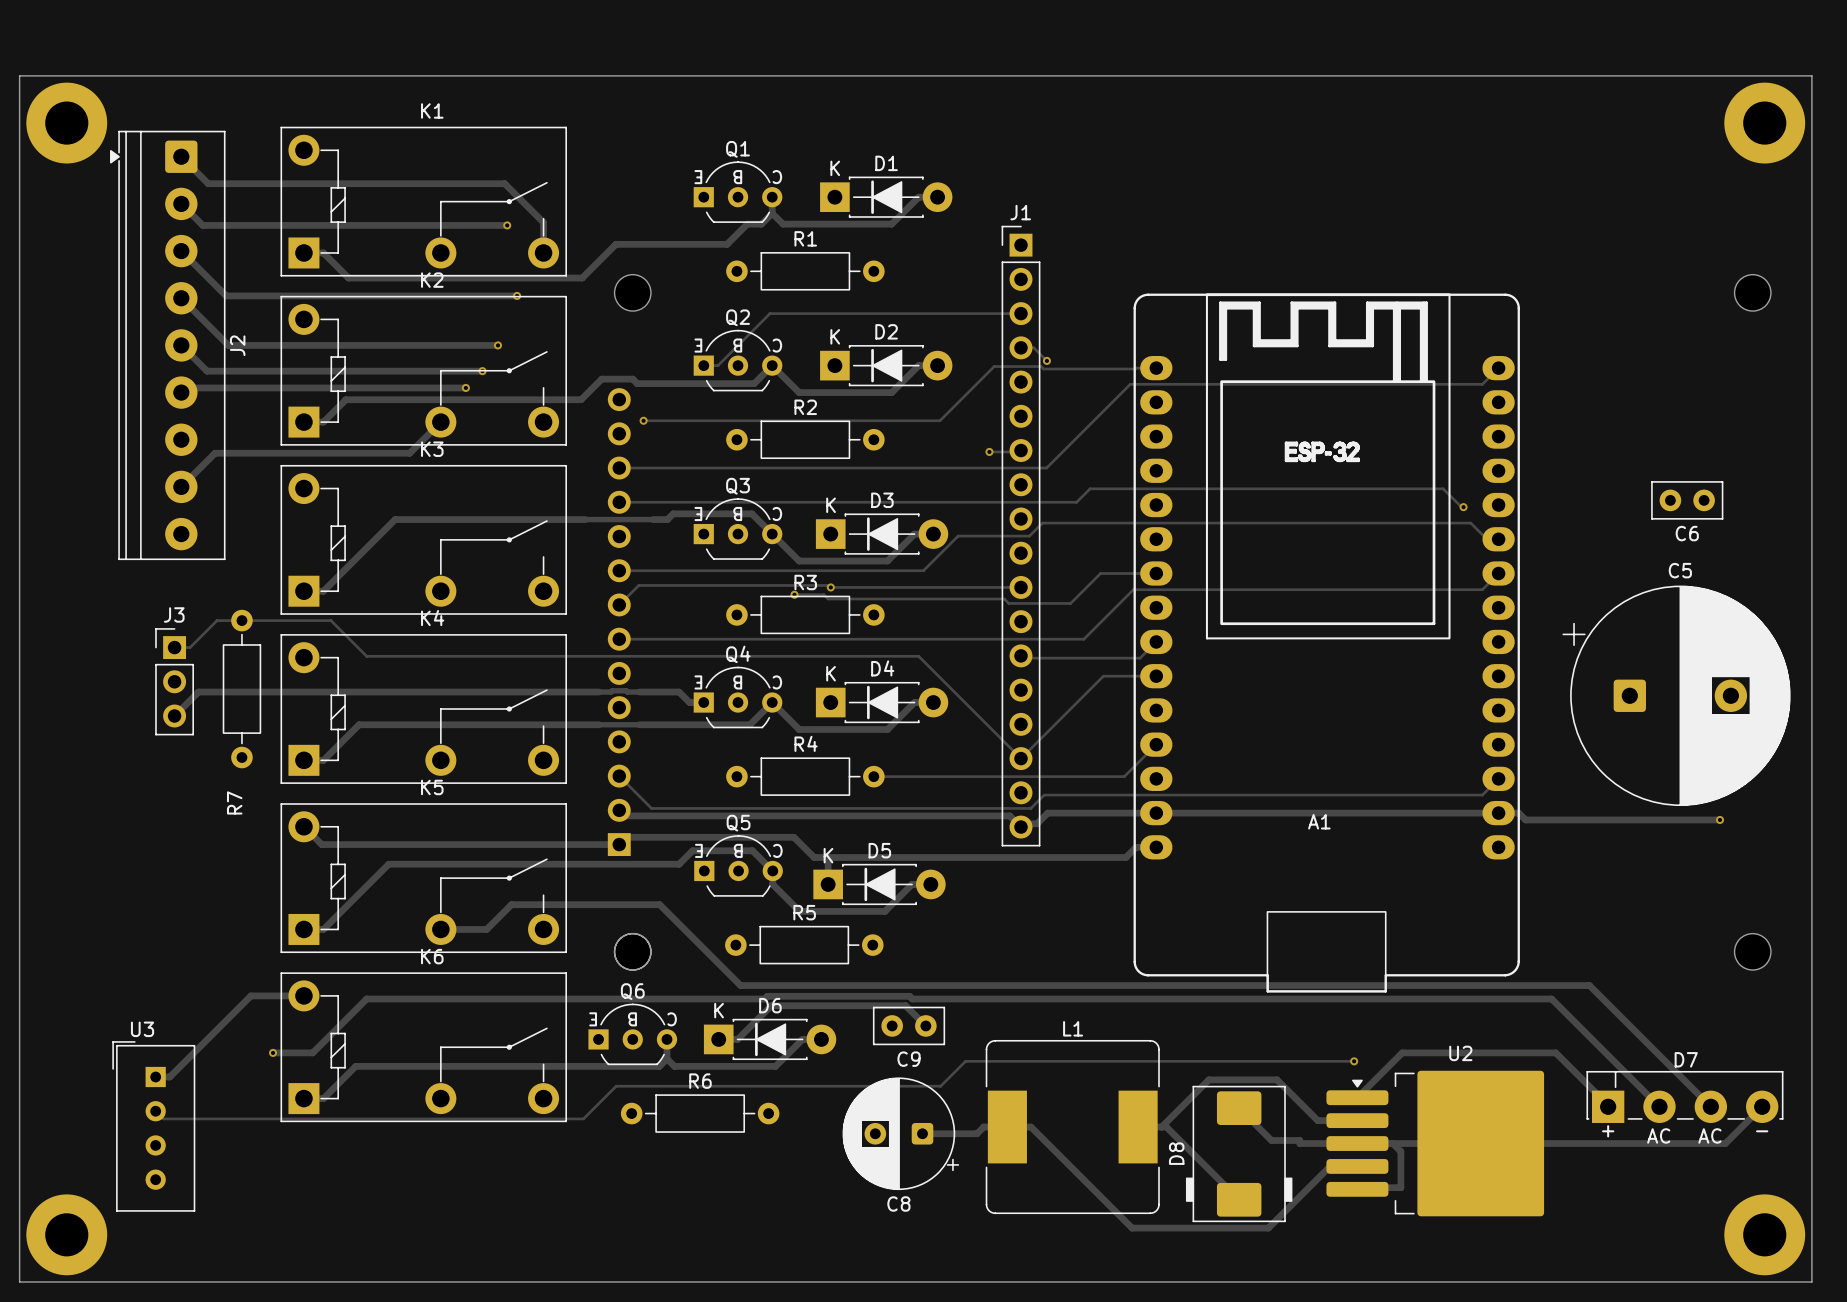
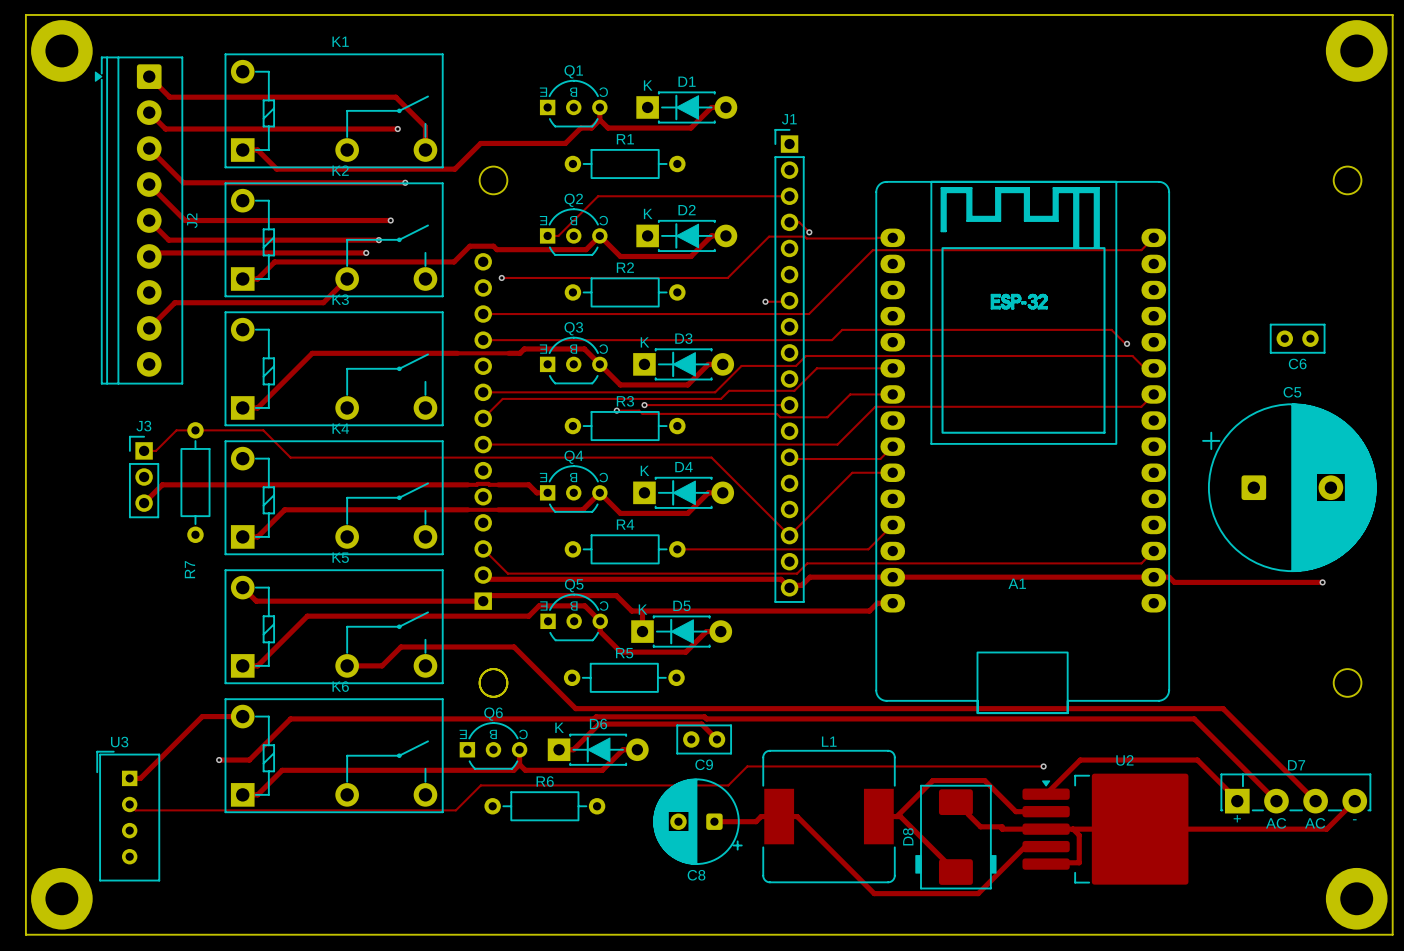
track: (638, 585) (828, 585) -> (498, 403) (502, 398) (721, 398) (729, 390) (794, 390) (816, 368) (892, 368)

